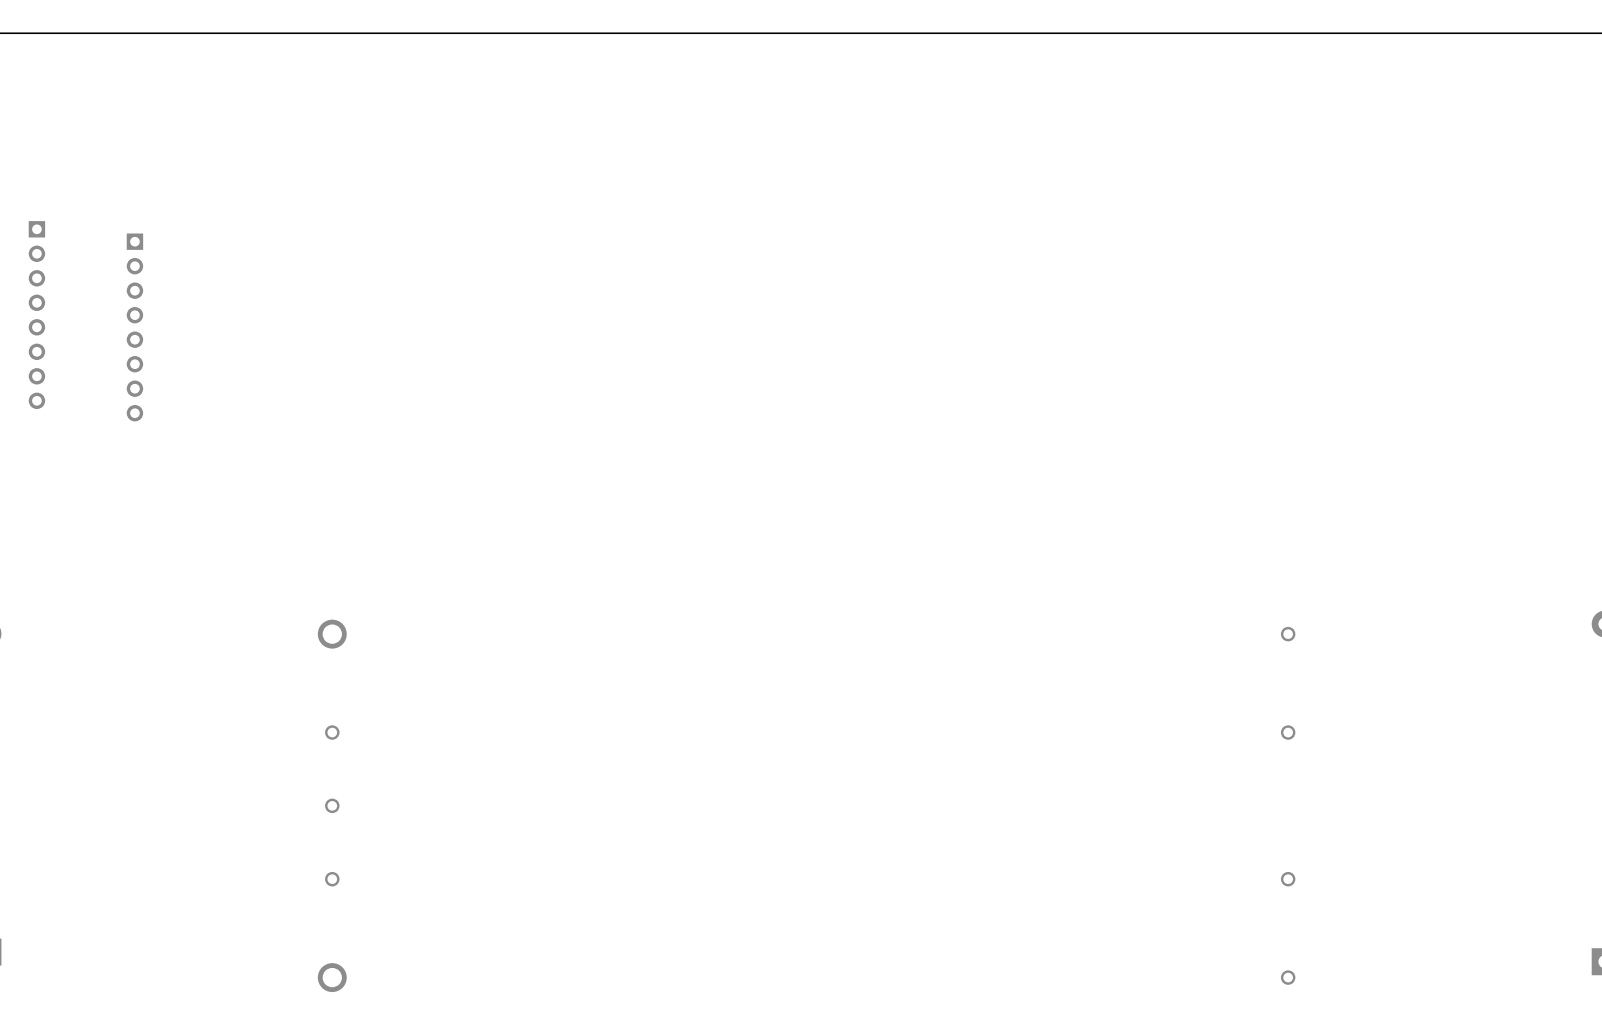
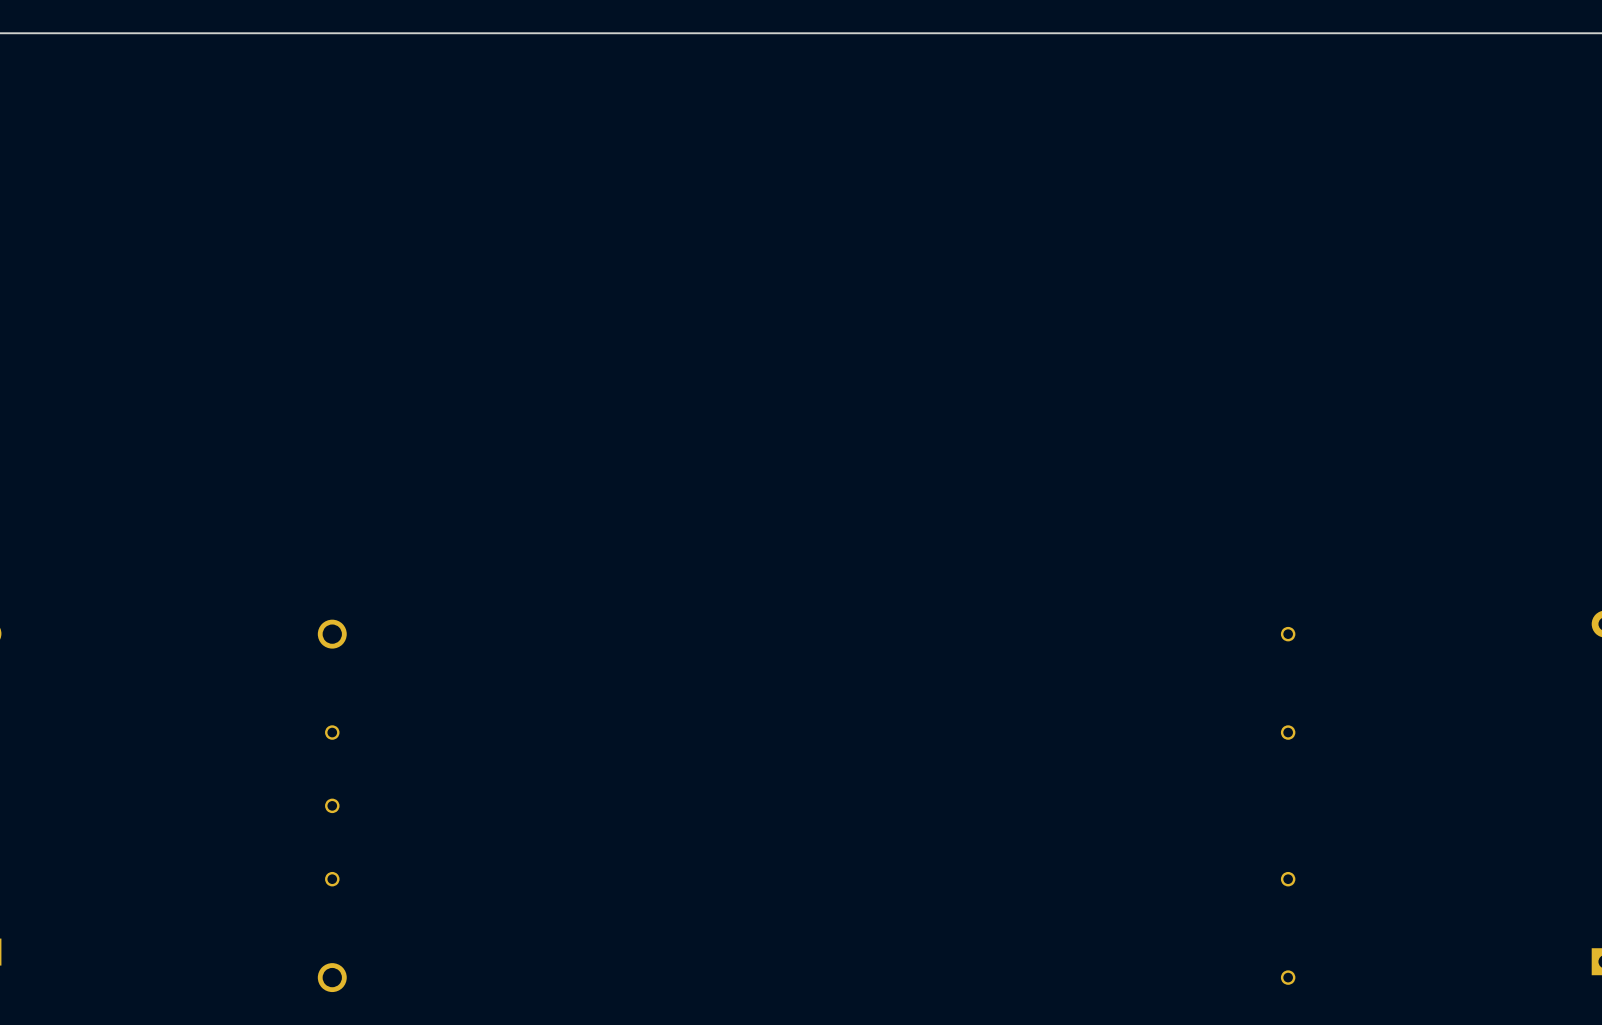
part: (36, 315) -> none
part: (134, 327) -> none

